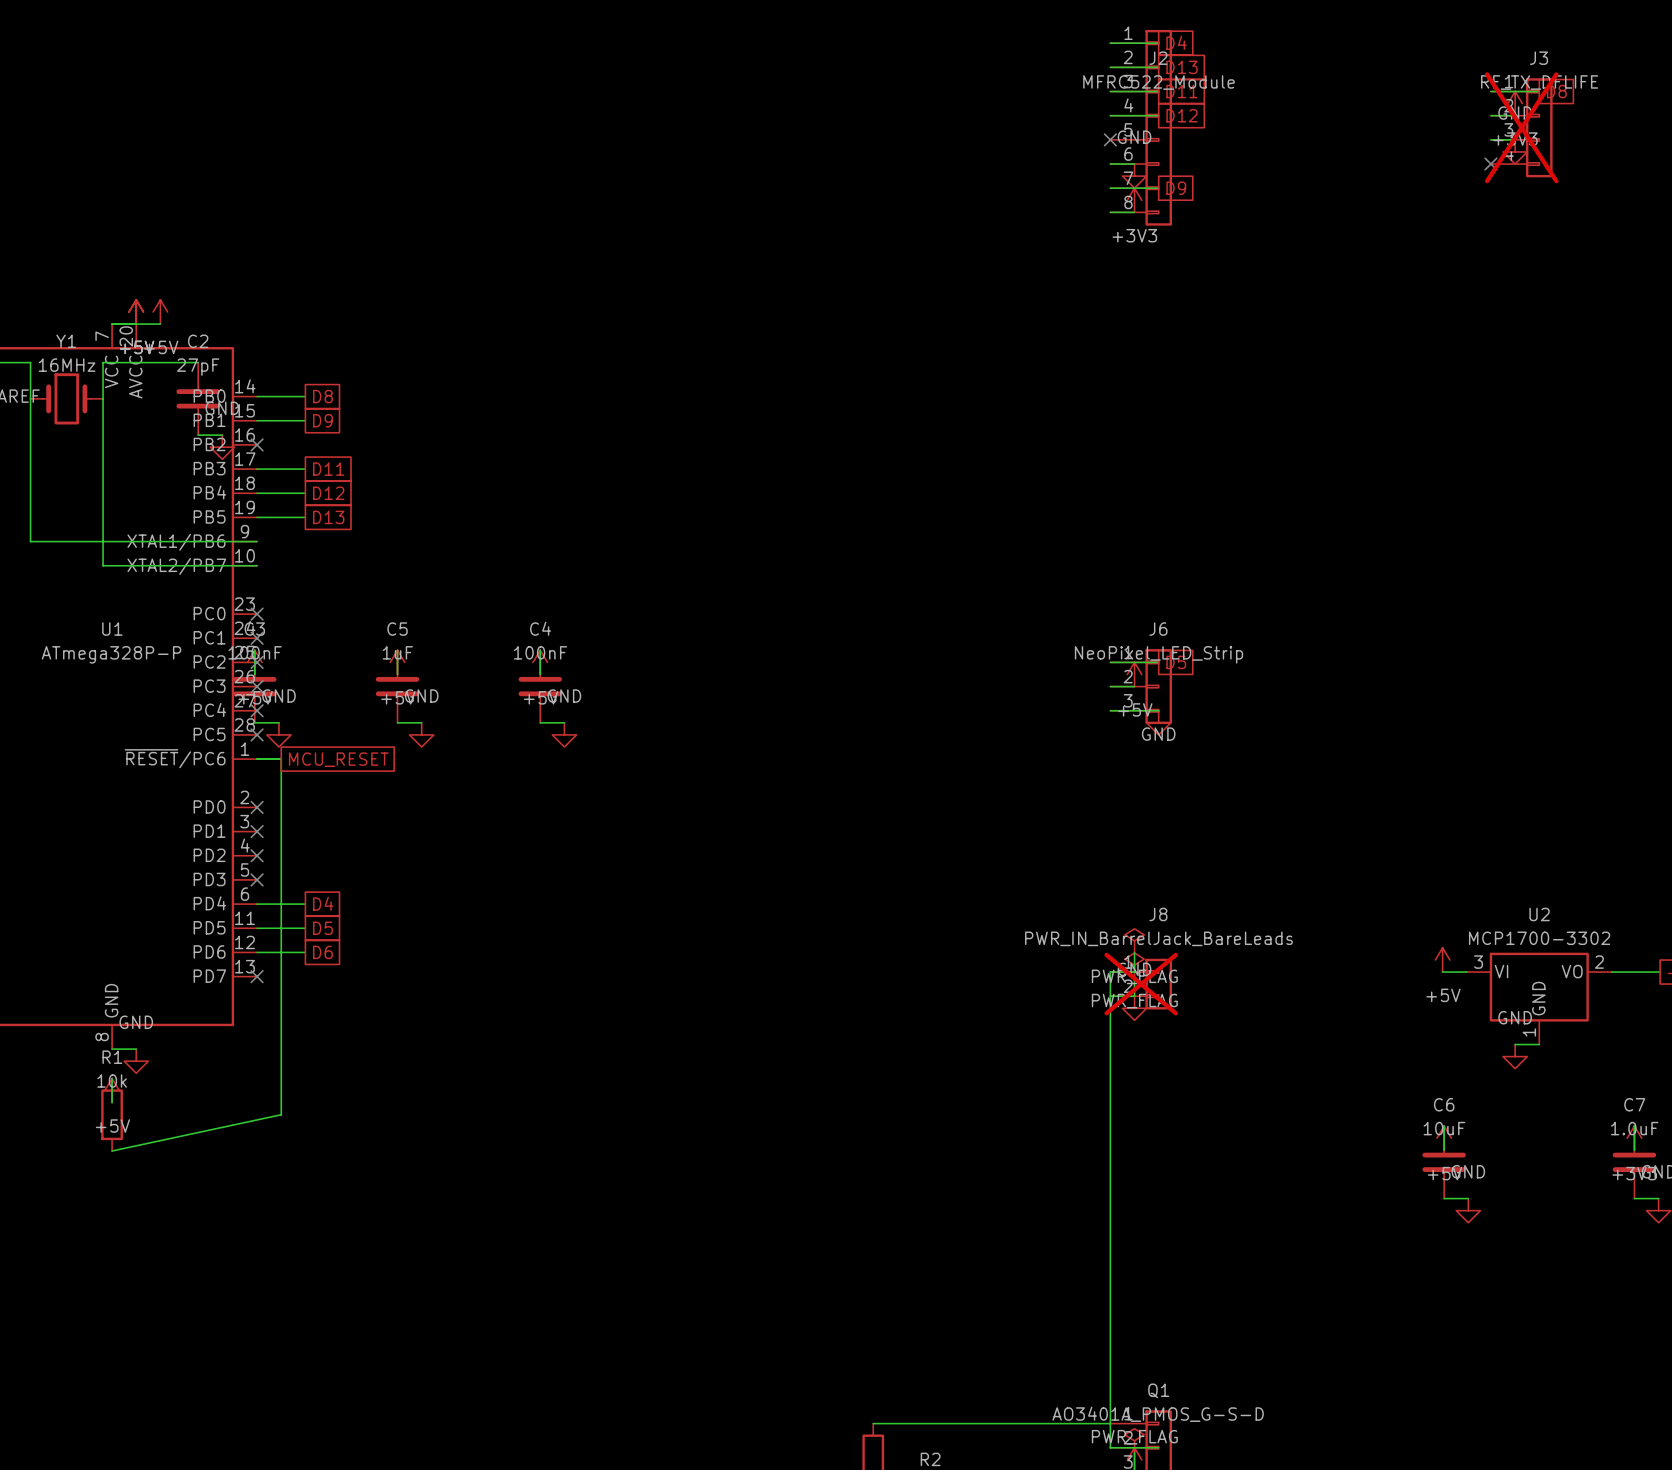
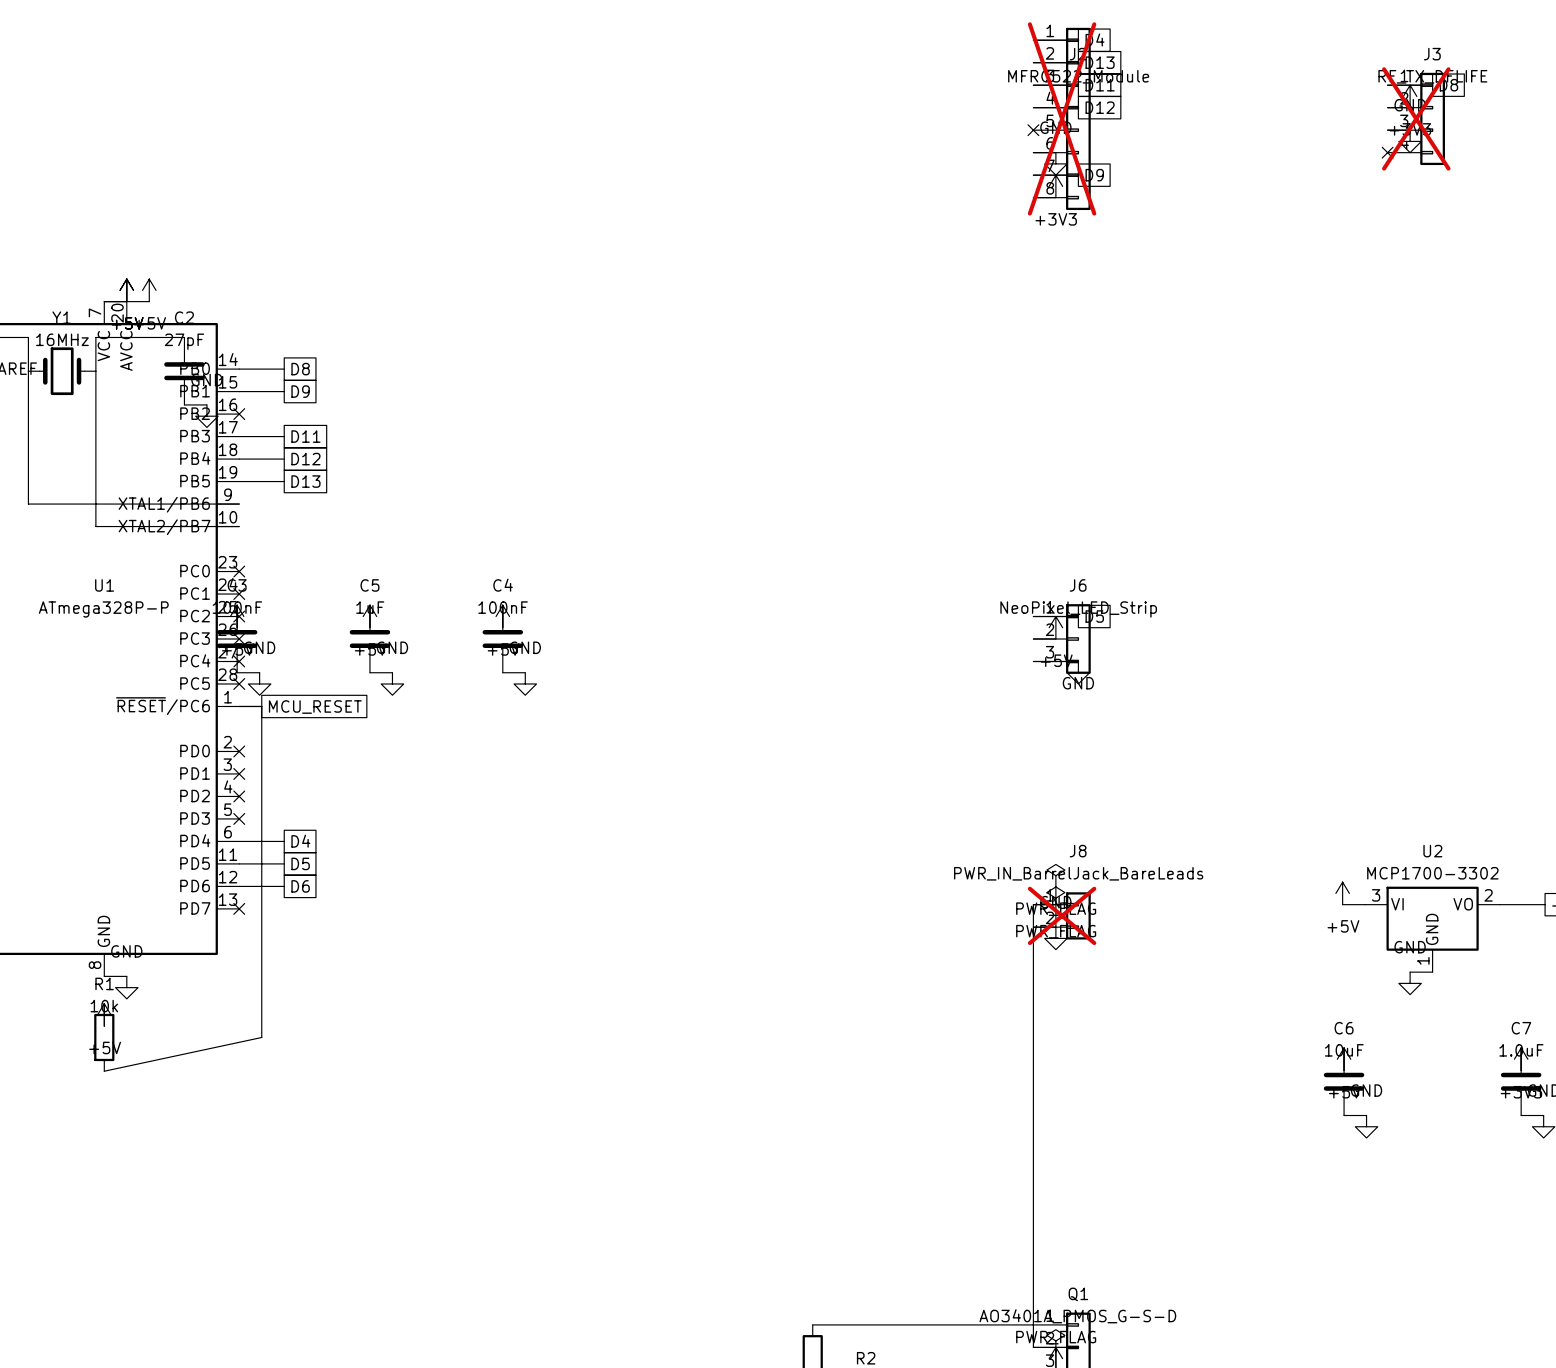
J2 do-not-place cross: none -> (1062, 118)

